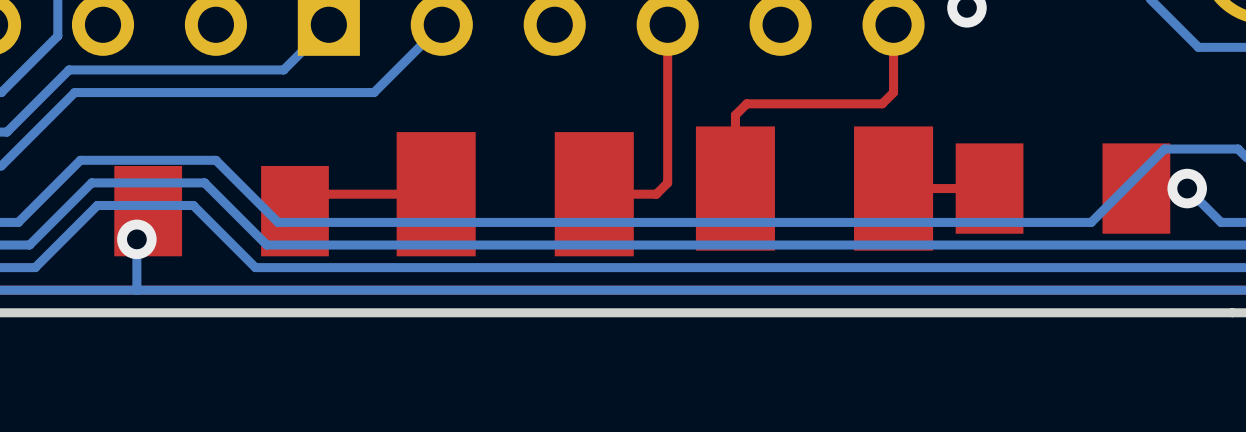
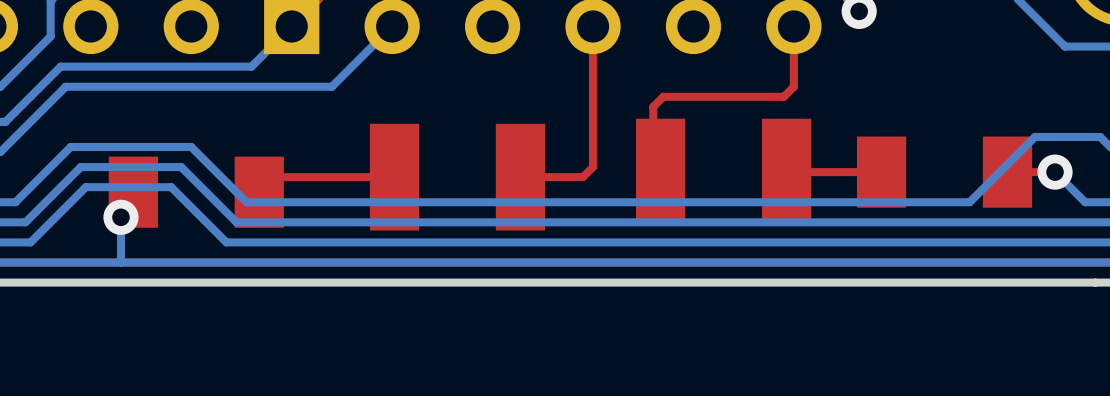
part footprint: [695, 126, 934, 251] -> [636, 118, 812, 226]
part footprint: [396, 132, 634, 257] -> [369, 123, 546, 231]
part footprint: [955, 143, 1171, 234] -> [856, 136, 1033, 208]
part footprint: [114, 165, 329, 257] -> [108, 156, 284, 228]

